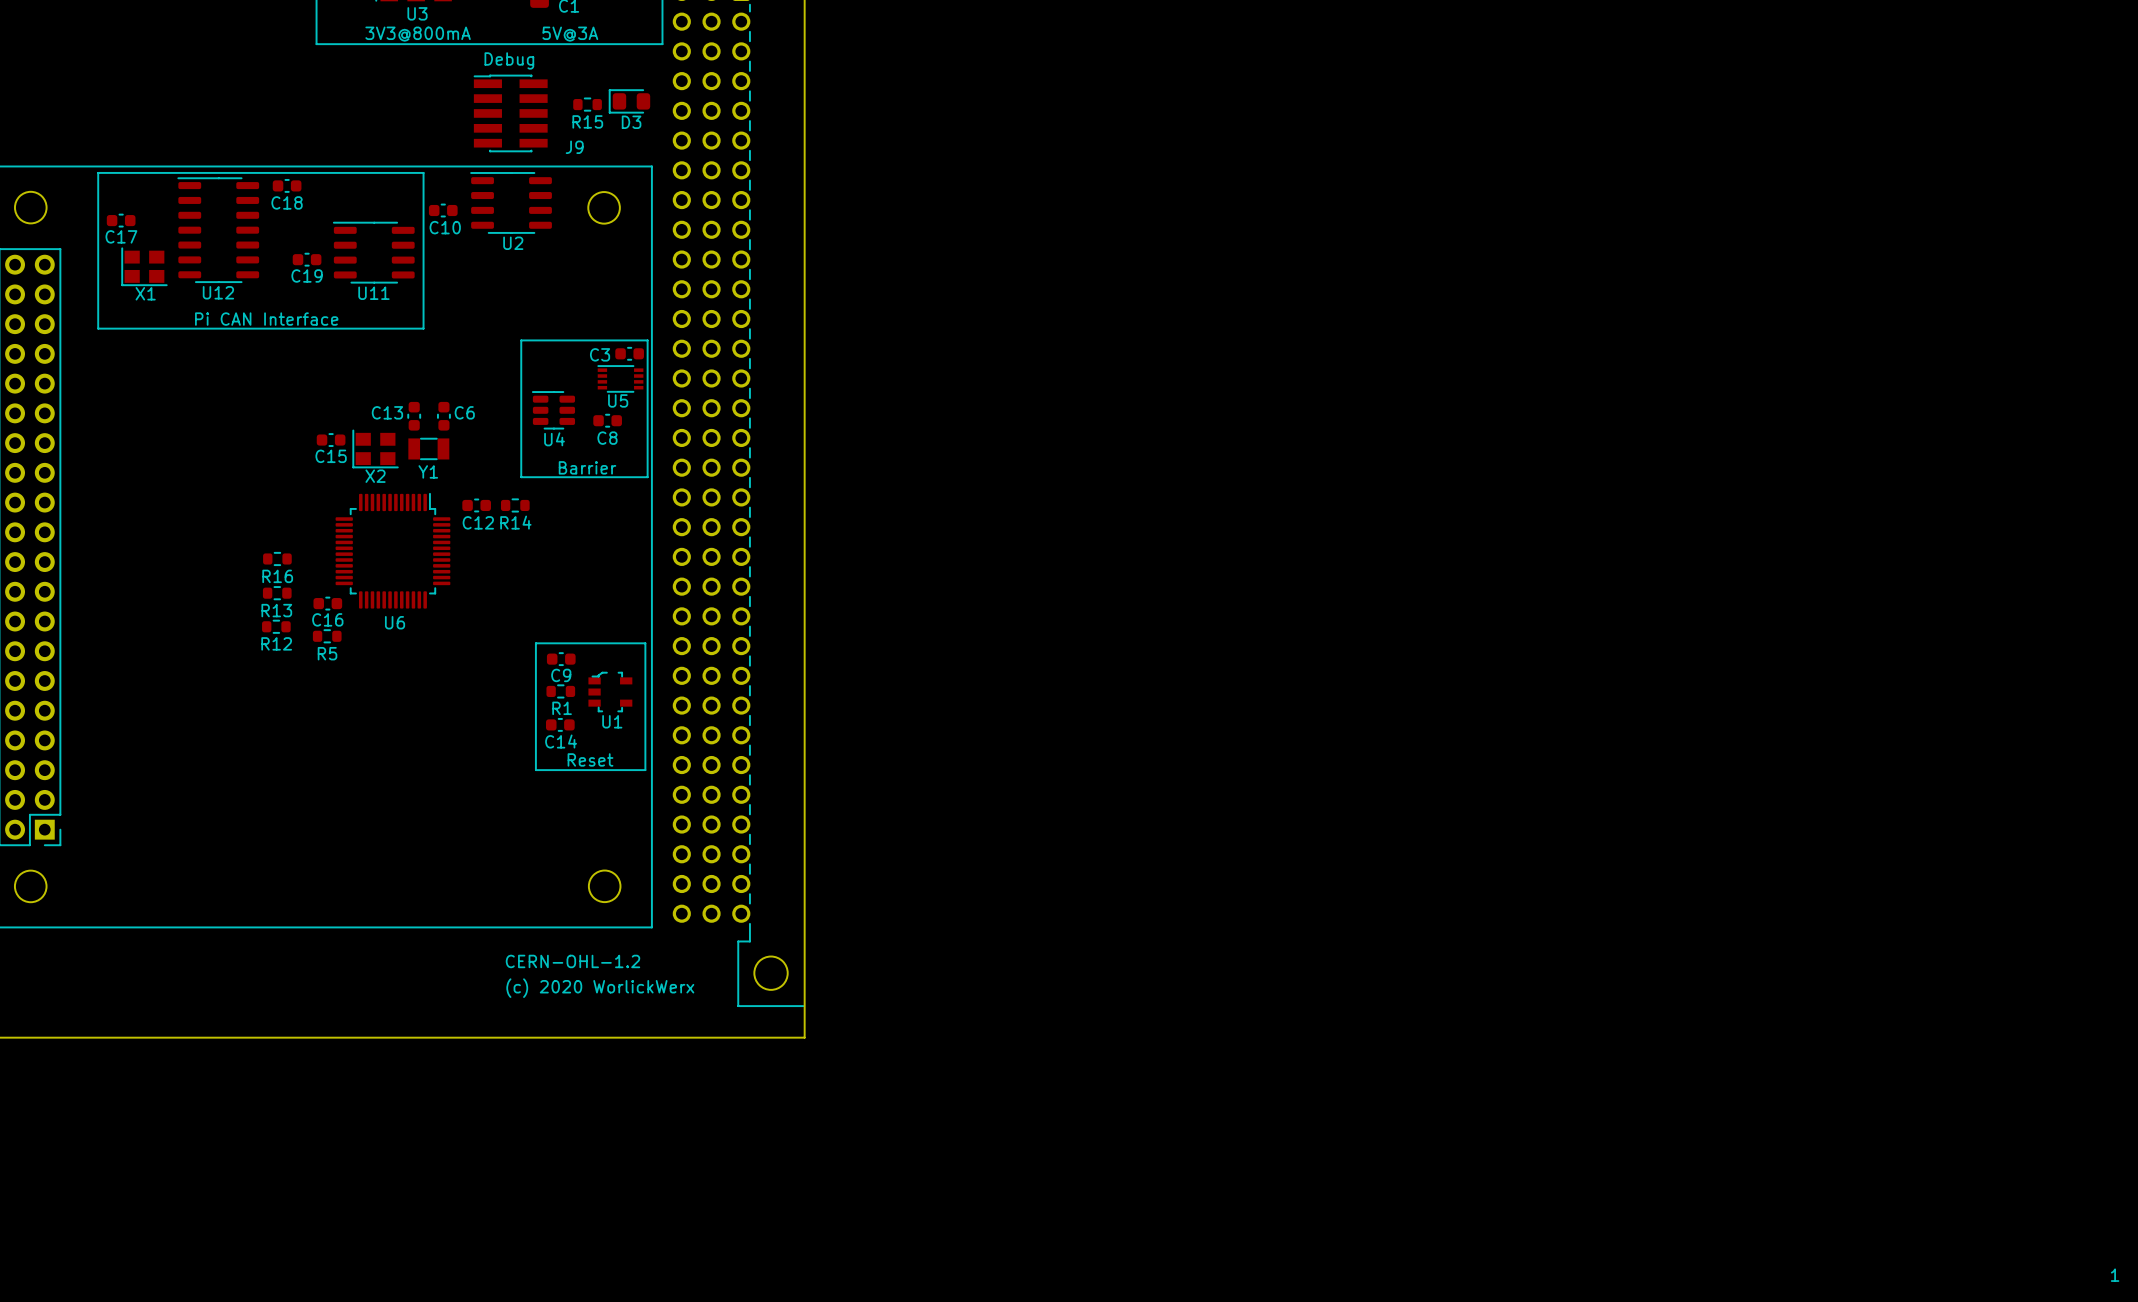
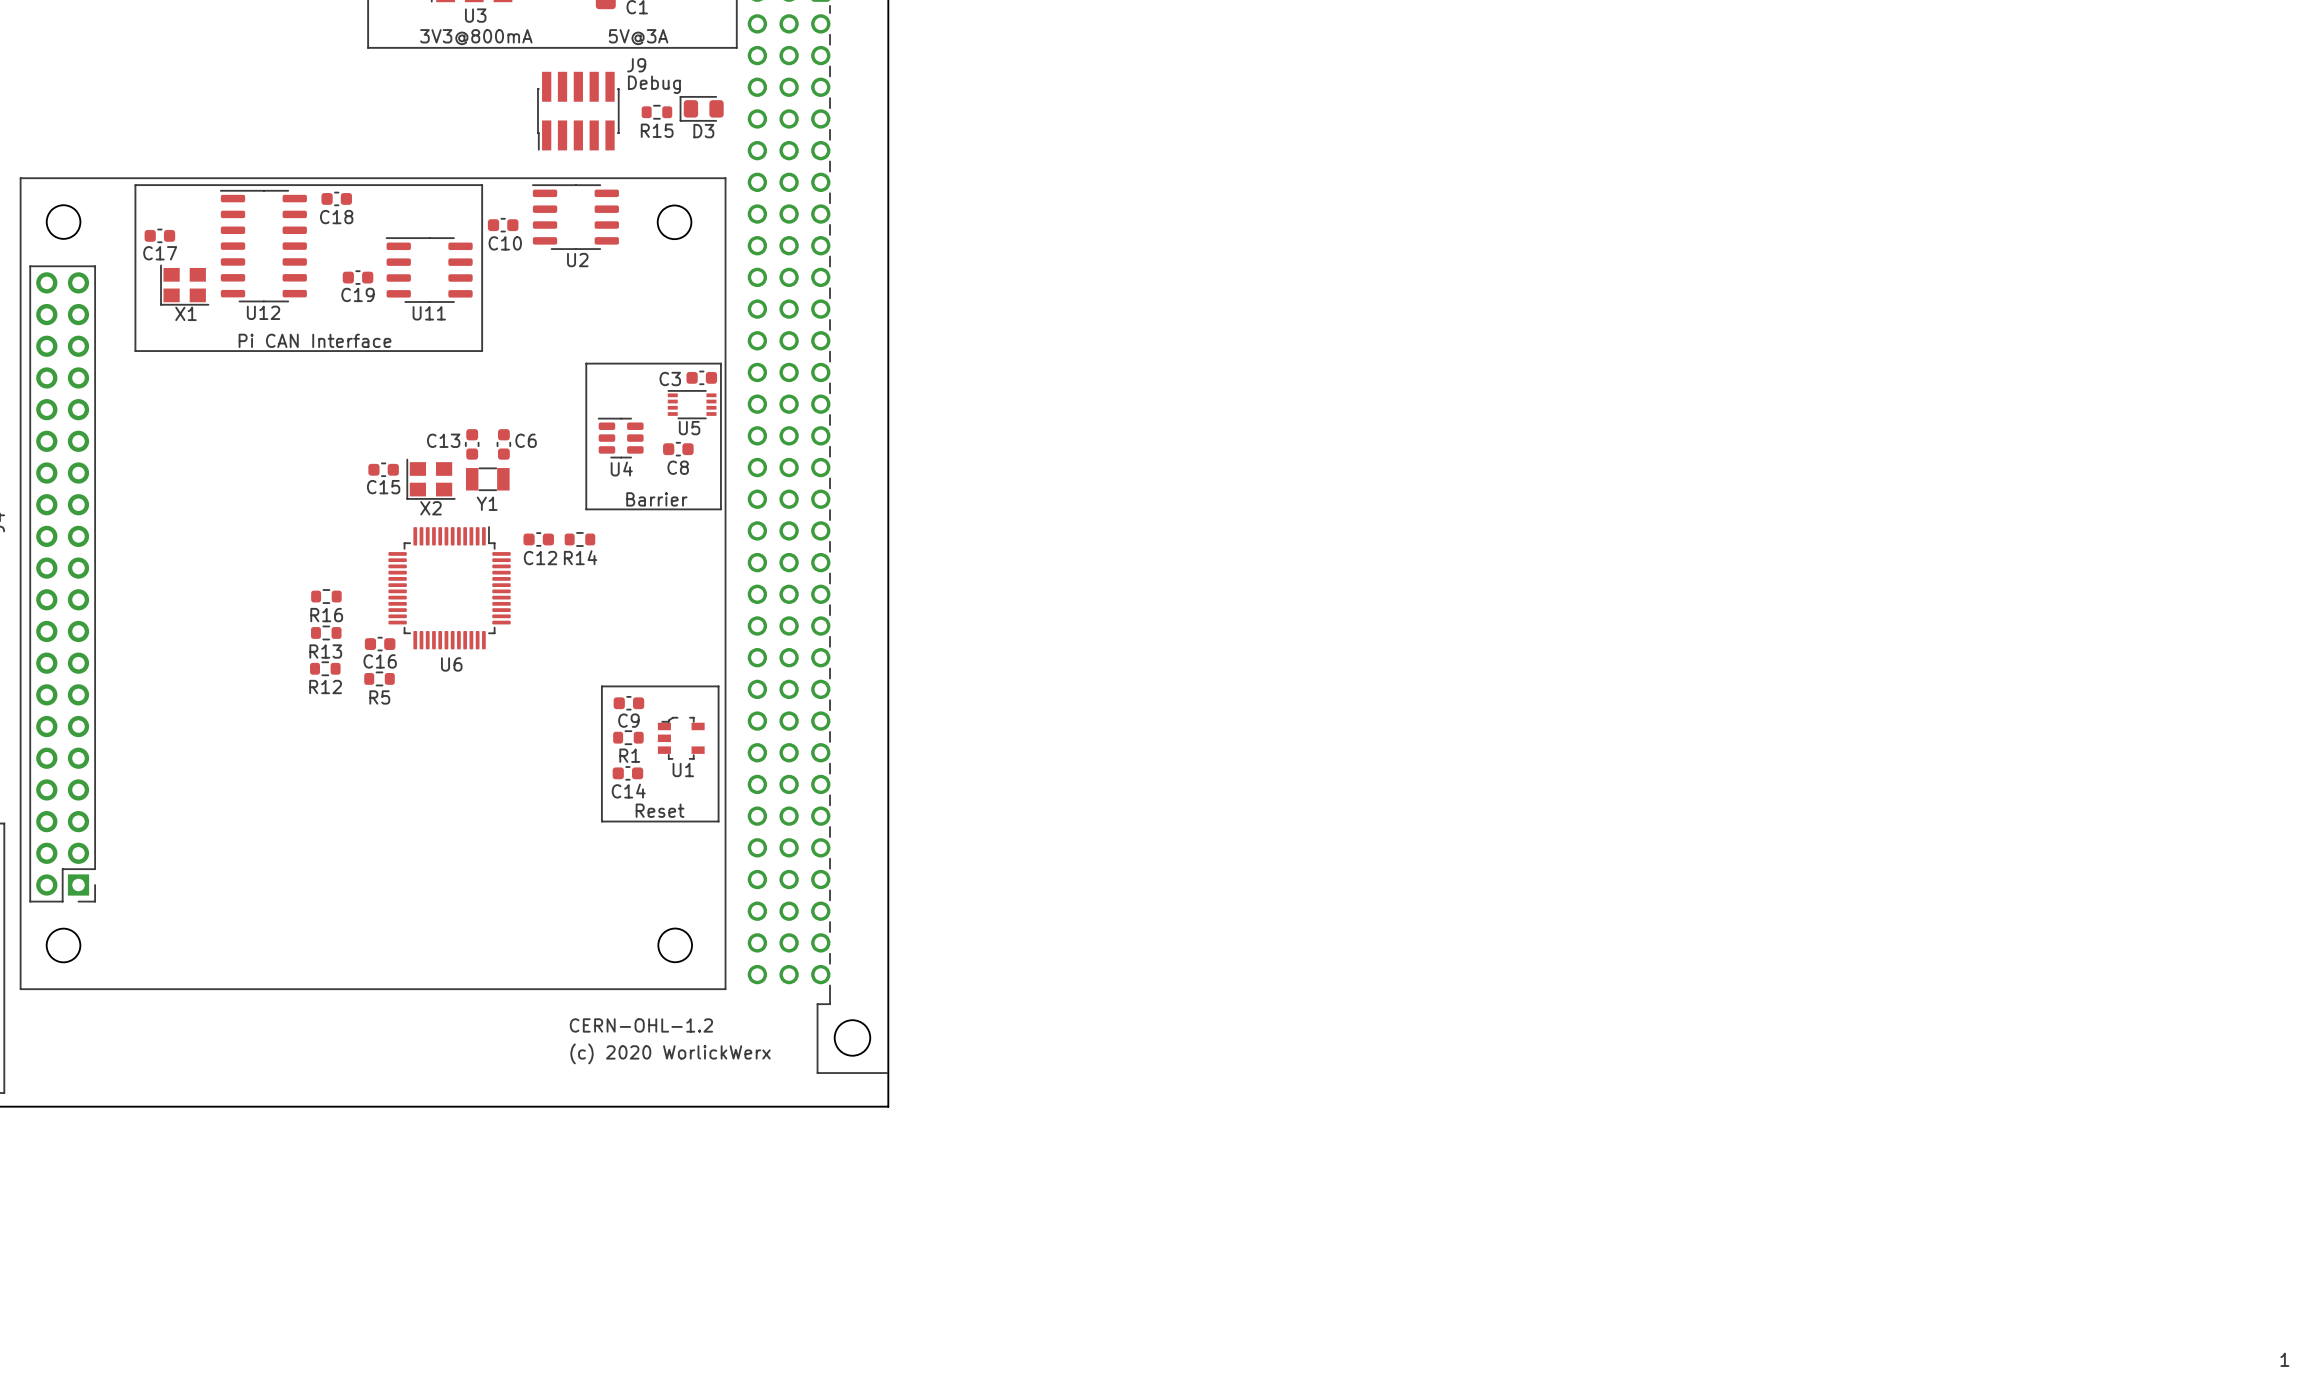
text position: Debug (509, 60) -> Debug (654, 84)
J9 rotation: 0° (510, 113) -> 90° counterclockwise (578, 111)
J9 name position: J9 (574, 147) -> J9 (636, 65)

